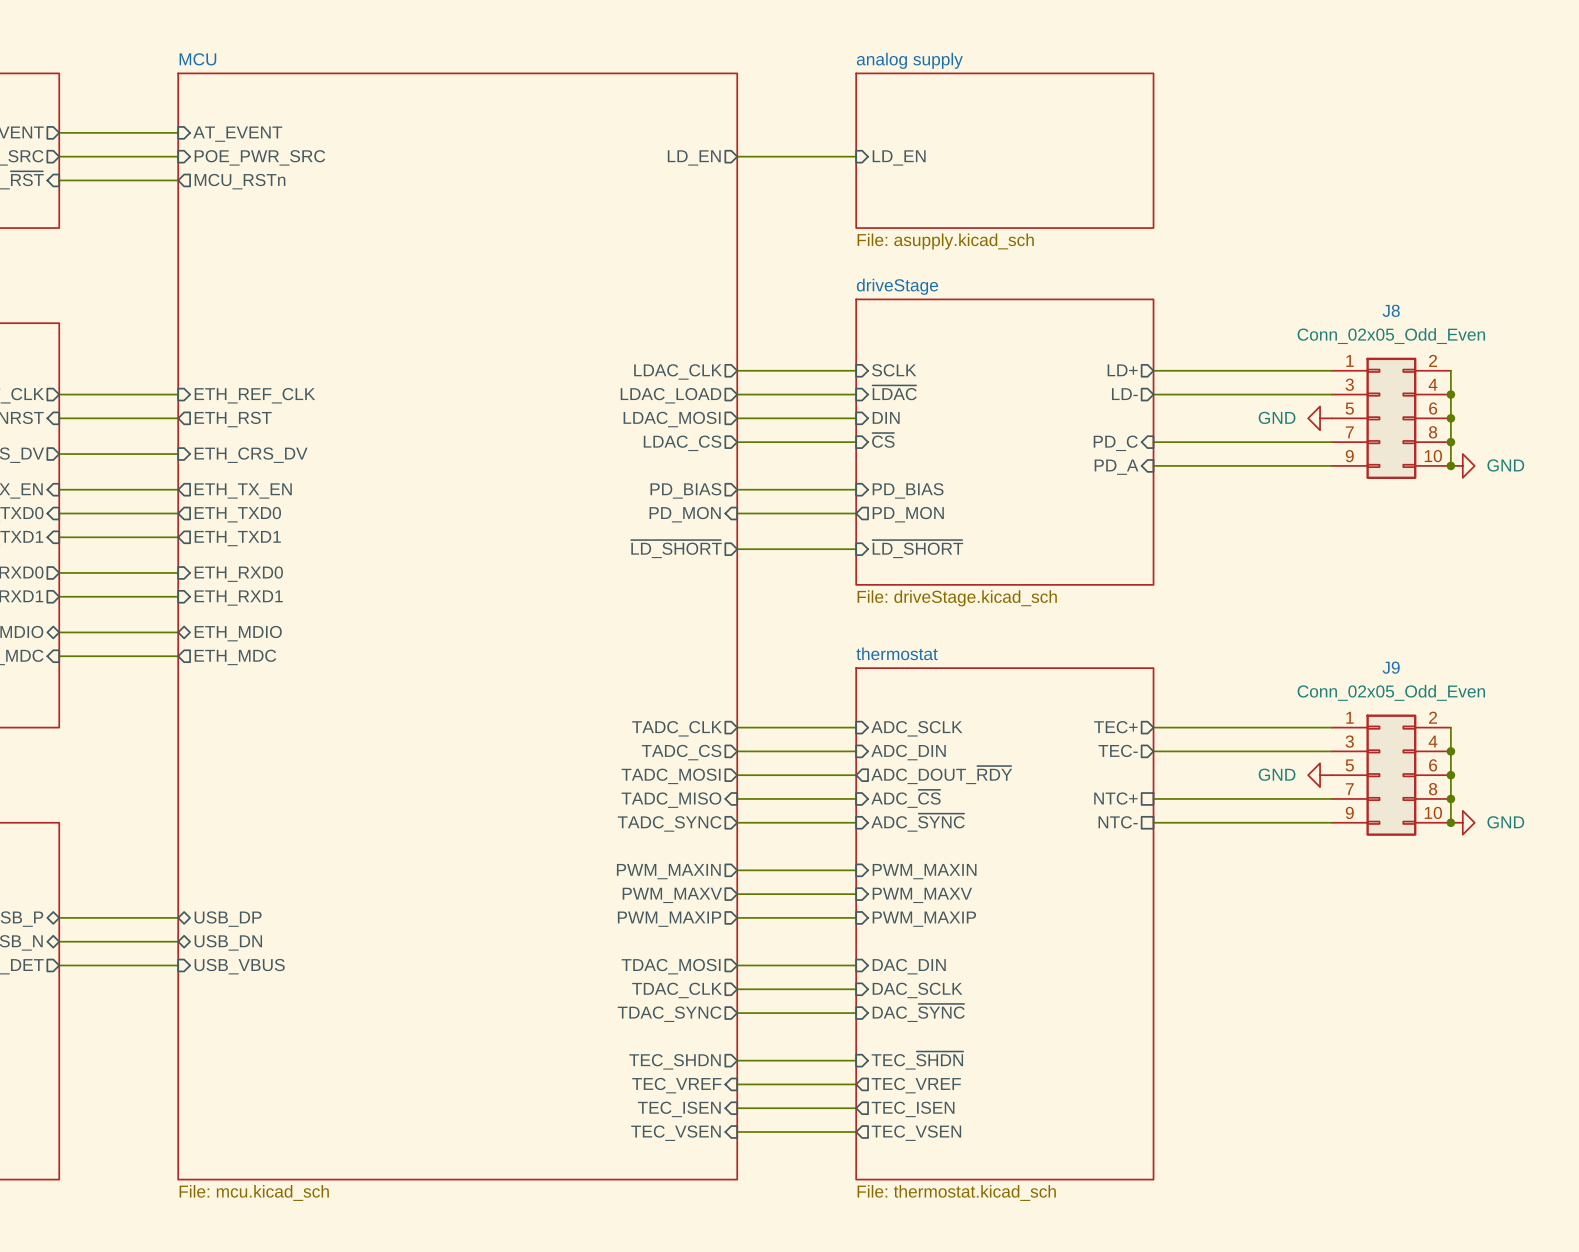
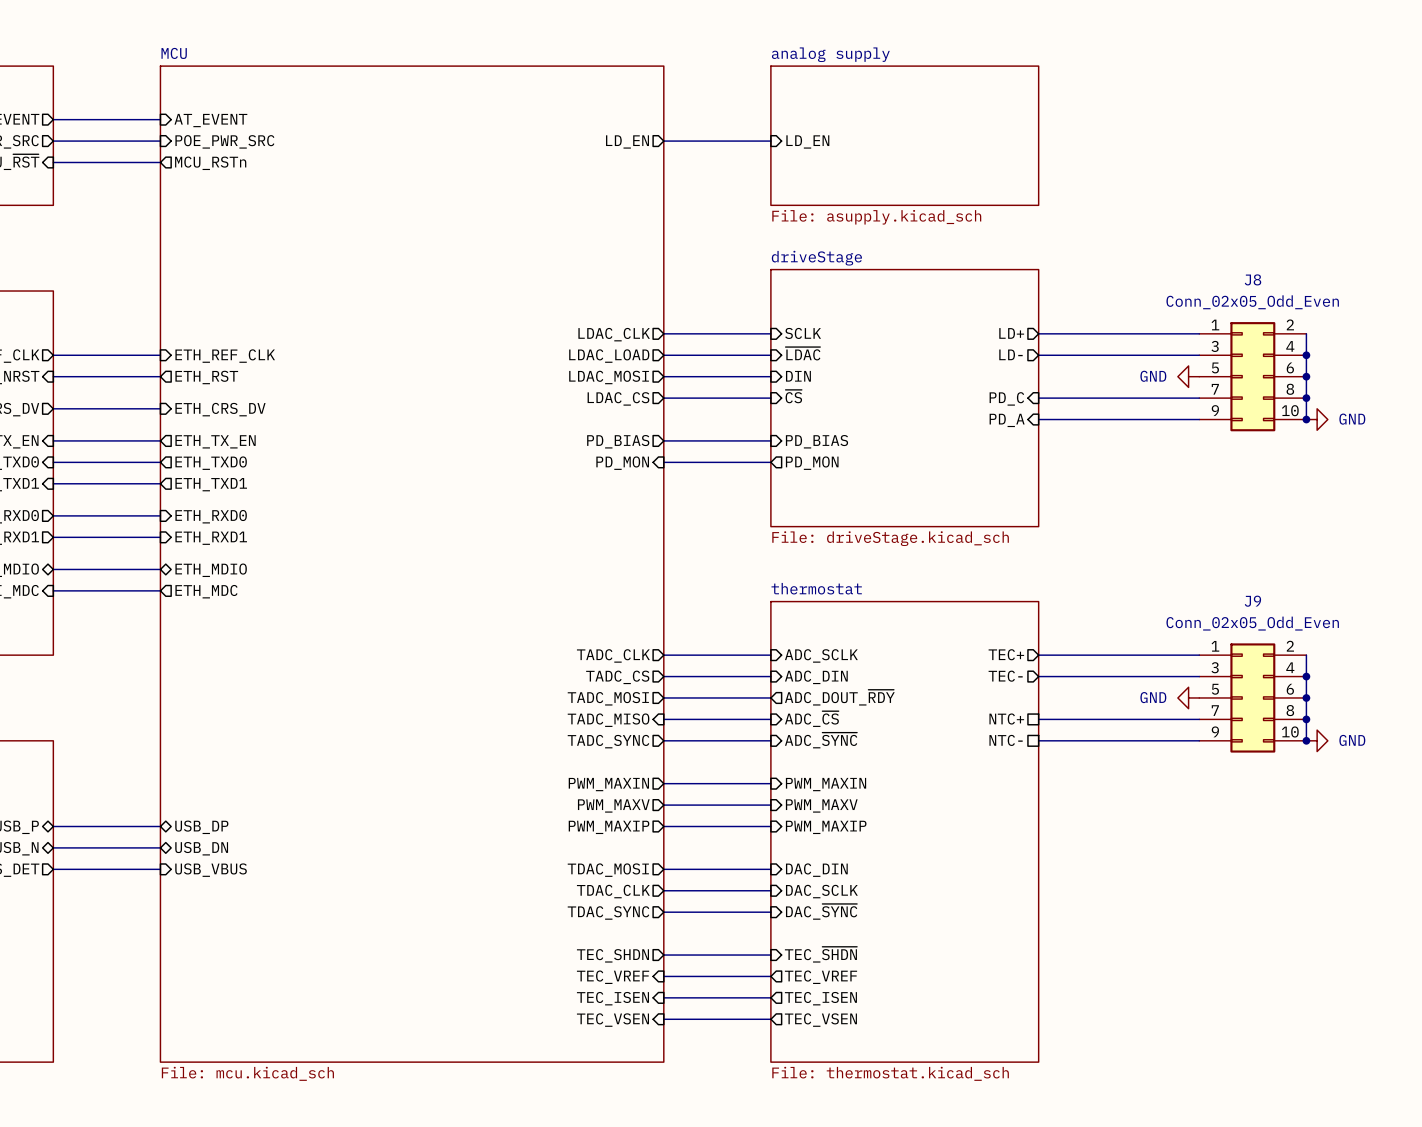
sheet pin: ~{LD_SHORT} (676, 549) -> none
wire: (737, 549) (856, 549) -> none
sheet pin: ~{LD_SHORT} (917, 549) -> none

